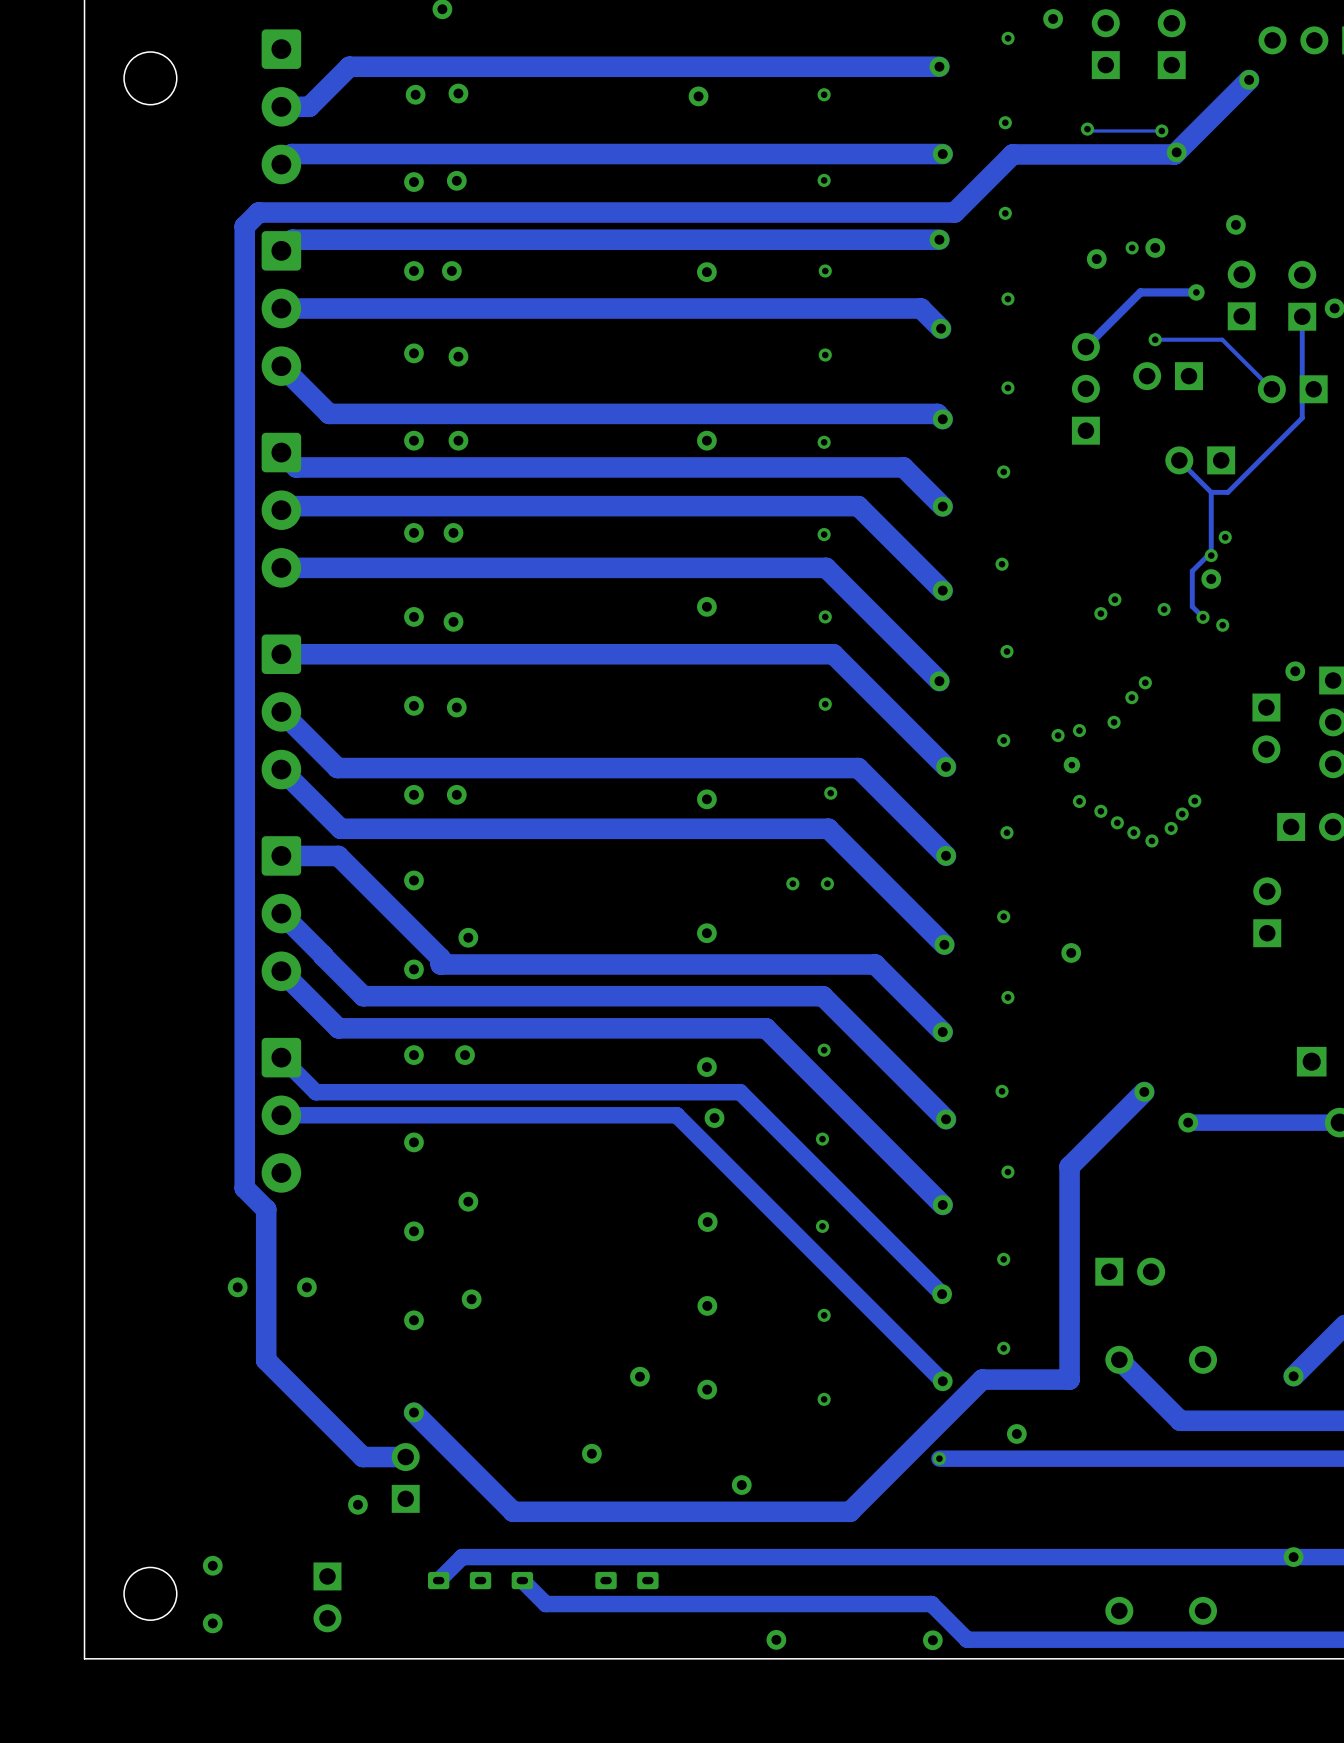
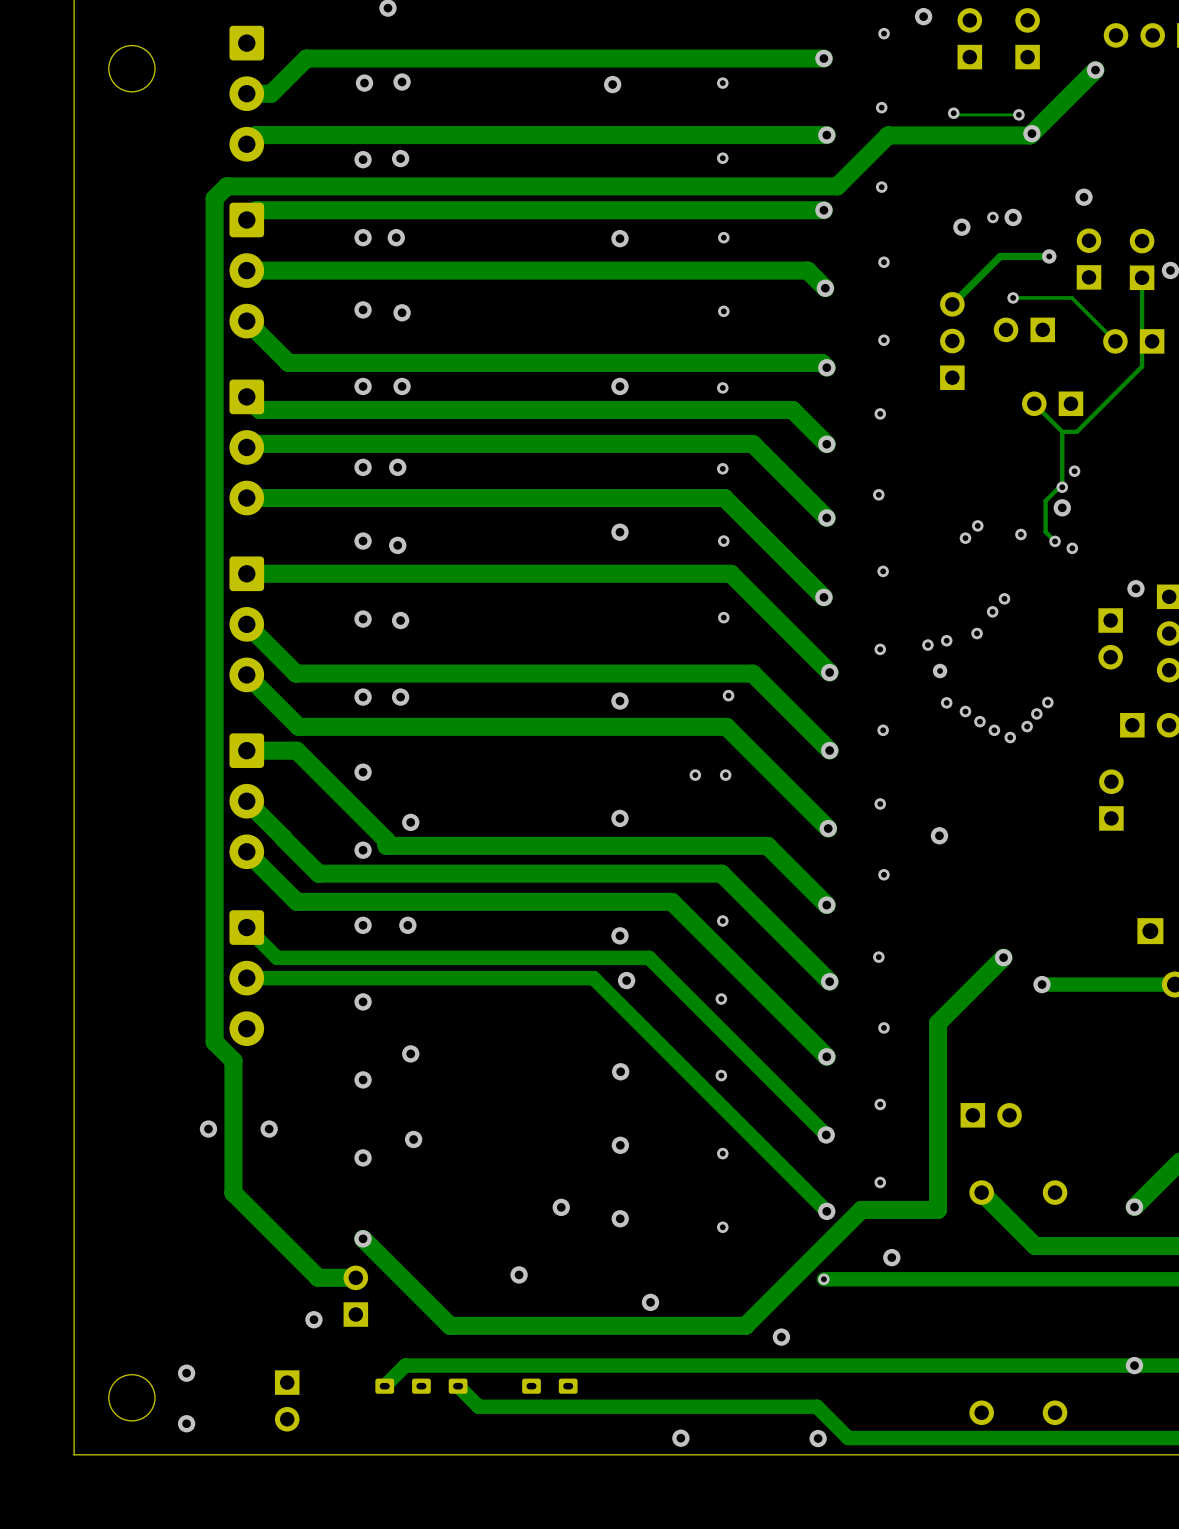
via: none -> (781, 1337)

